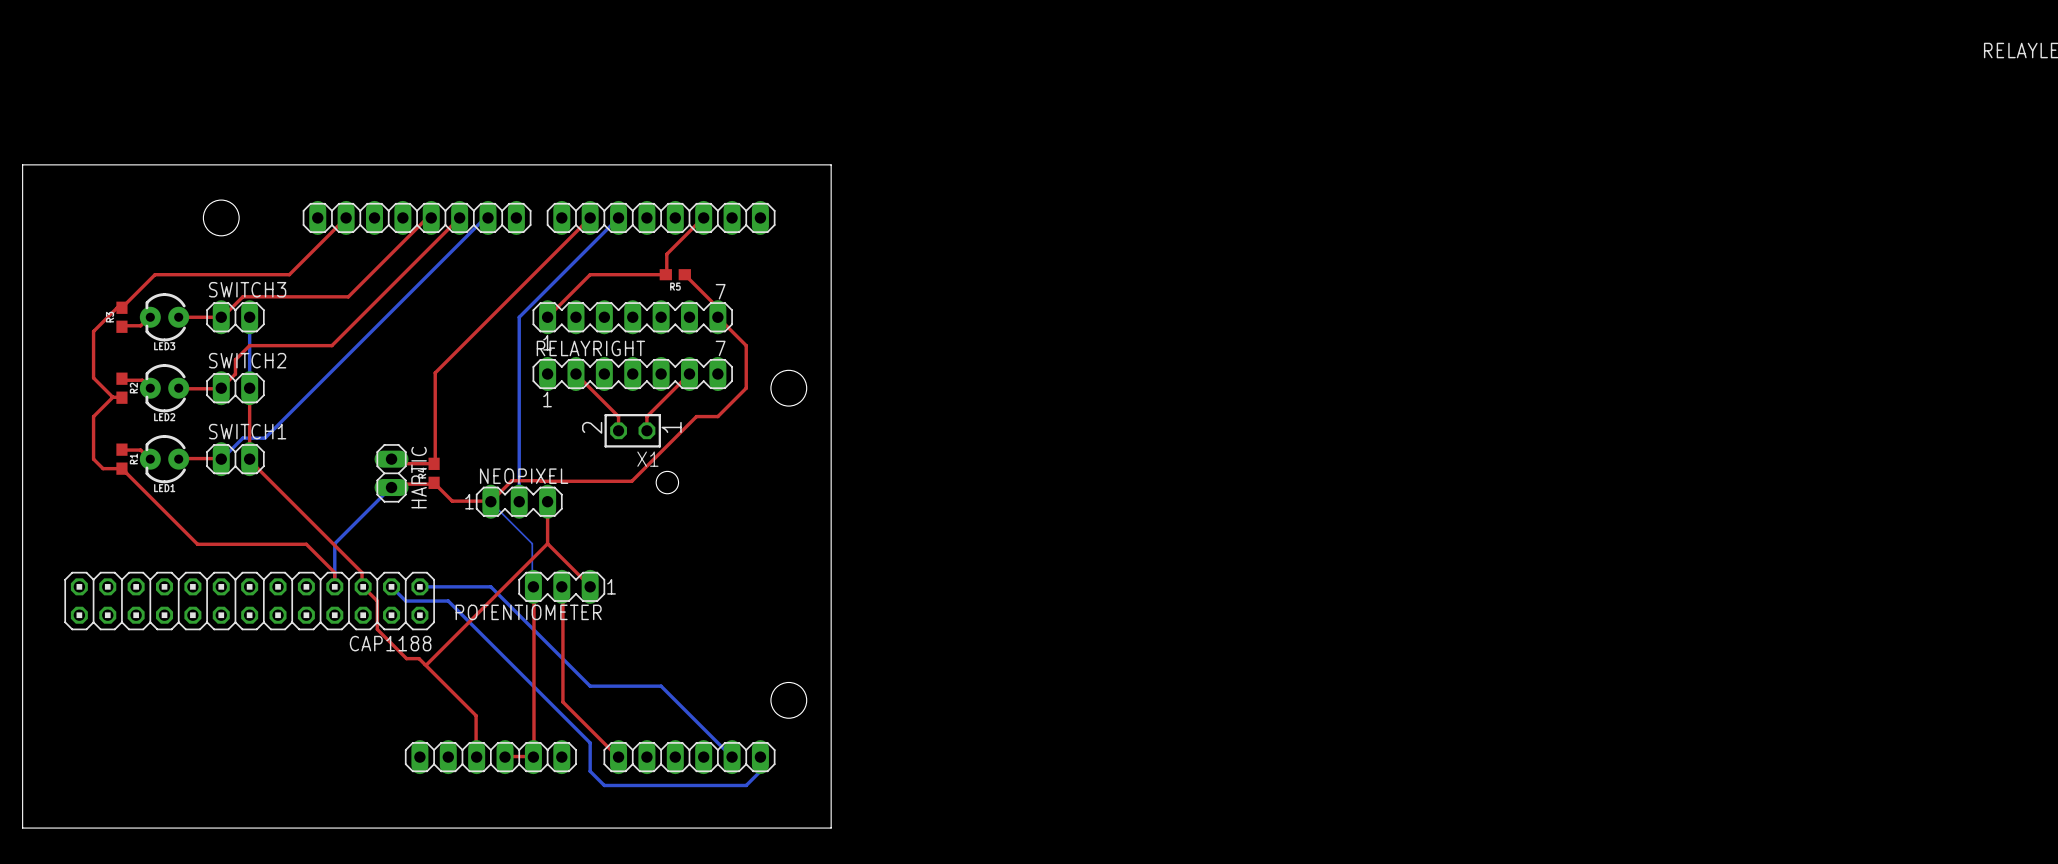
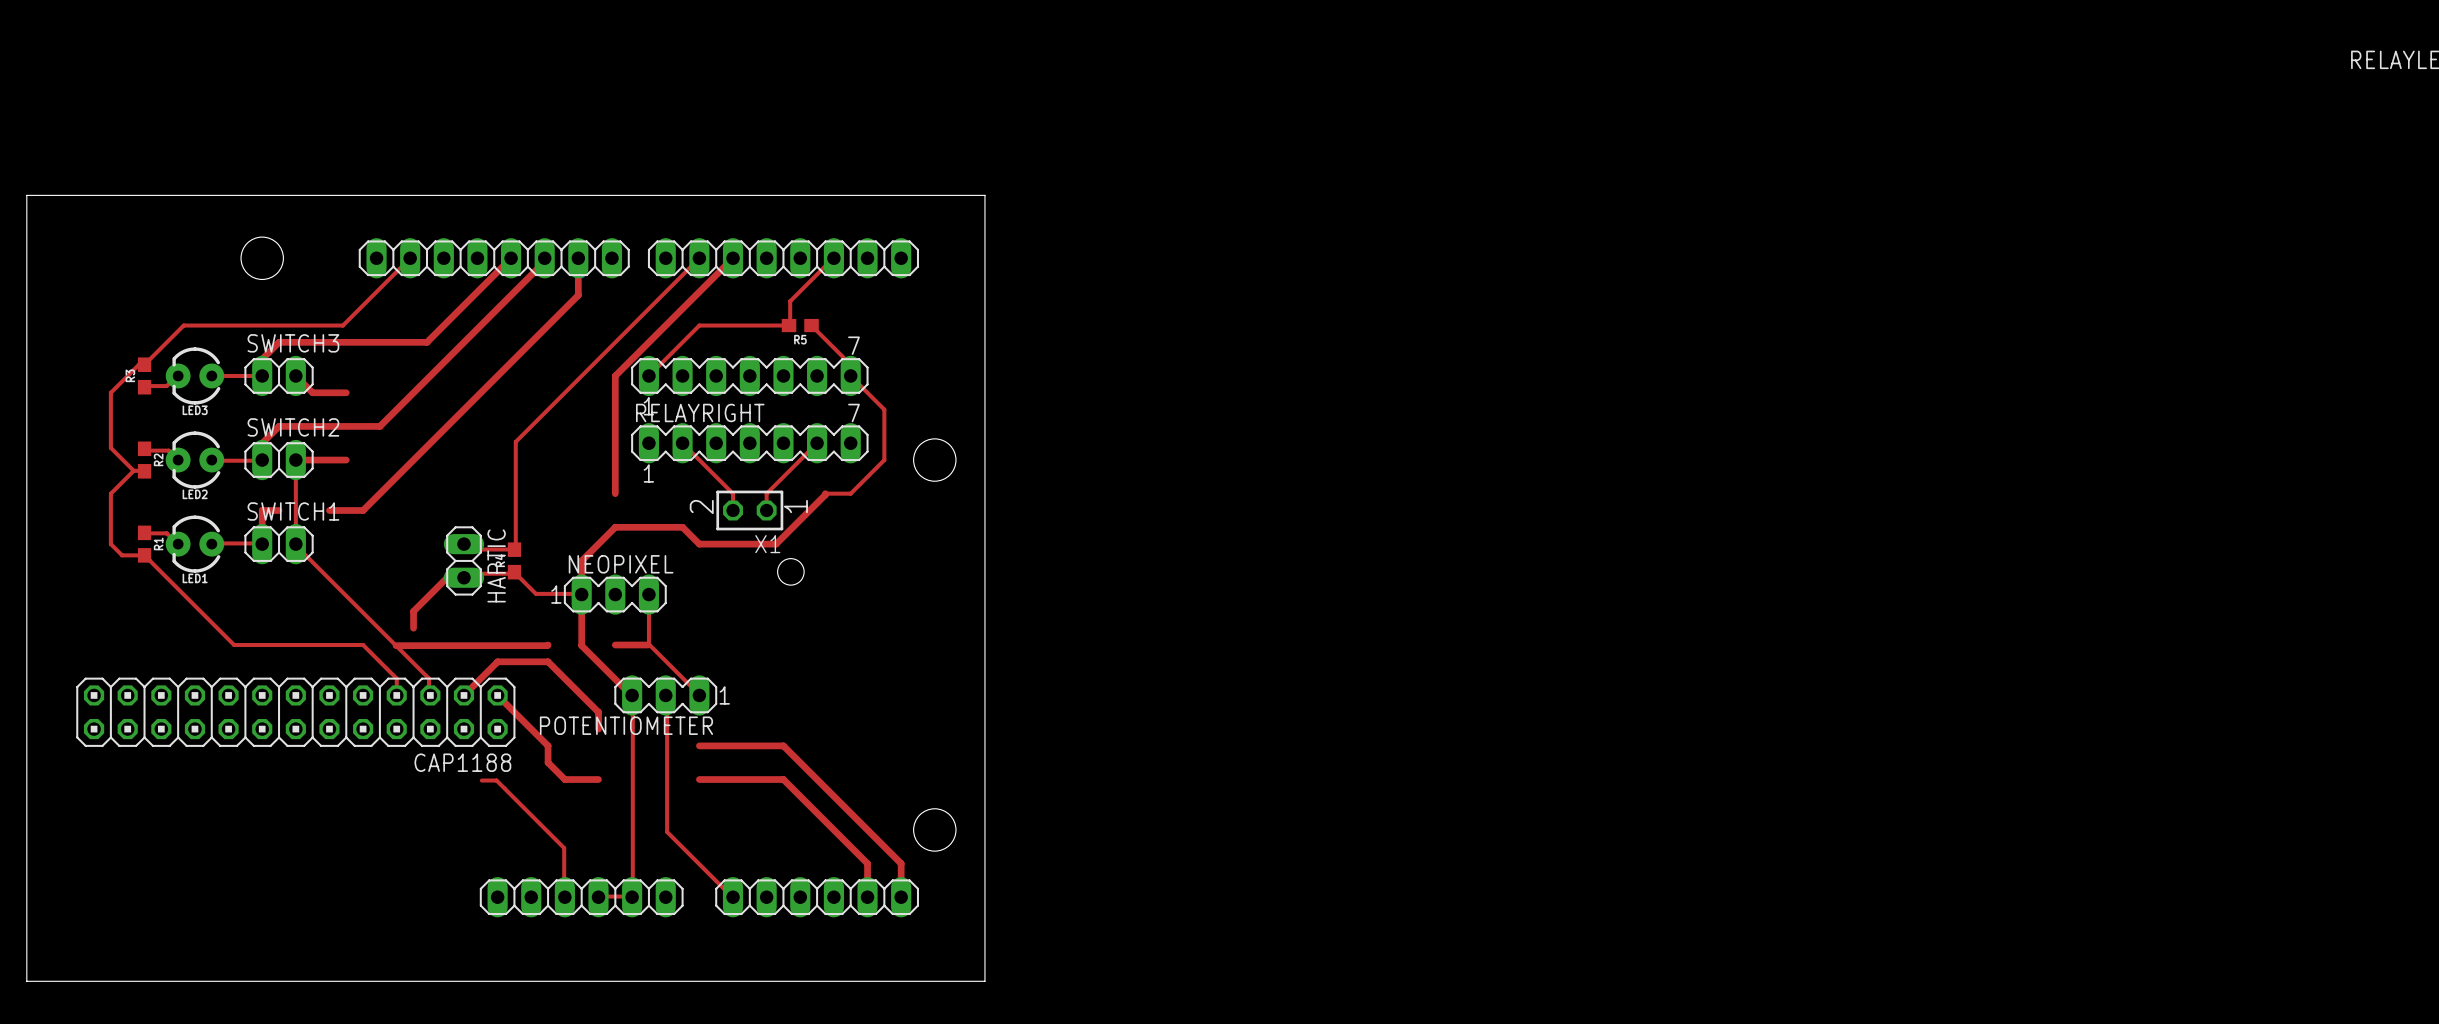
top track: none -> (511, 258) (427, 342) (279, 342) (262, 359) (262, 375)
top track: none -> (578, 258) (578, 295) (363, 510) (329, 510)
top track: none -> (733, 258) (615, 375) (615, 493)
top track: (426, 218) (348, 296) (242, 296) (222, 317) -> none
top track: (459, 218) (331, 345) (249, 345) (235, 359) (235, 374) (221, 388) -> (548, 258) (379, 426) (279, 426) (262, 443) (262, 460)
bottom track: (484, 218) (264, 438) (242, 438) (222, 458) -> none
bottom track: (618, 231) (618, 217) (519, 317) (519, 501) -> none
top track: none -> (295, 375) (312, 392) (346, 392)
bottom track: (249, 317) (249, 388) -> none
top track: none -> (295, 460) (346, 460)
top track: (696, 416) (631, 481) (511, 480) (490, 501) -> (825, 493) (776, 544) (699, 544) (682, 527) (615, 527) (581, 560) (581, 645) (632, 696)
top track: none -> (279, 510) (262, 510) (262, 544)
bottom track: (390, 487) (334, 543) (334, 586) -> none
top track: none -> (463, 577) (447, 577) (413, 611) (413, 628)
bottom track: (491, 502) (532, 543) (532, 586) -> none
top track: none -> (548, 645) (396, 645)
top track: (547, 544) (426, 664) -> (648, 645) (615, 645)
top track: (363, 586) (377, 601) (377, 629) (406, 658) -> none
top track: none -> (463, 695) (497, 661) (548, 661) (598, 712) (598, 729)
bottom track: (391, 586) (405, 601) (448, 601) (590, 742) (590, 771) (604, 785) (746, 785) (760, 771) -> none
top track: none -> (497, 695) (548, 745) (548, 762) (564, 779) (598, 779)
bottom track: (419, 586) (490, 586) (590, 686) (661, 686) (732, 757) -> none
top track: none -> (699, 745) (783, 745) (901, 863) (901, 897)
top track: none -> (699, 779) (783, 779) (867, 863) (867, 897)

